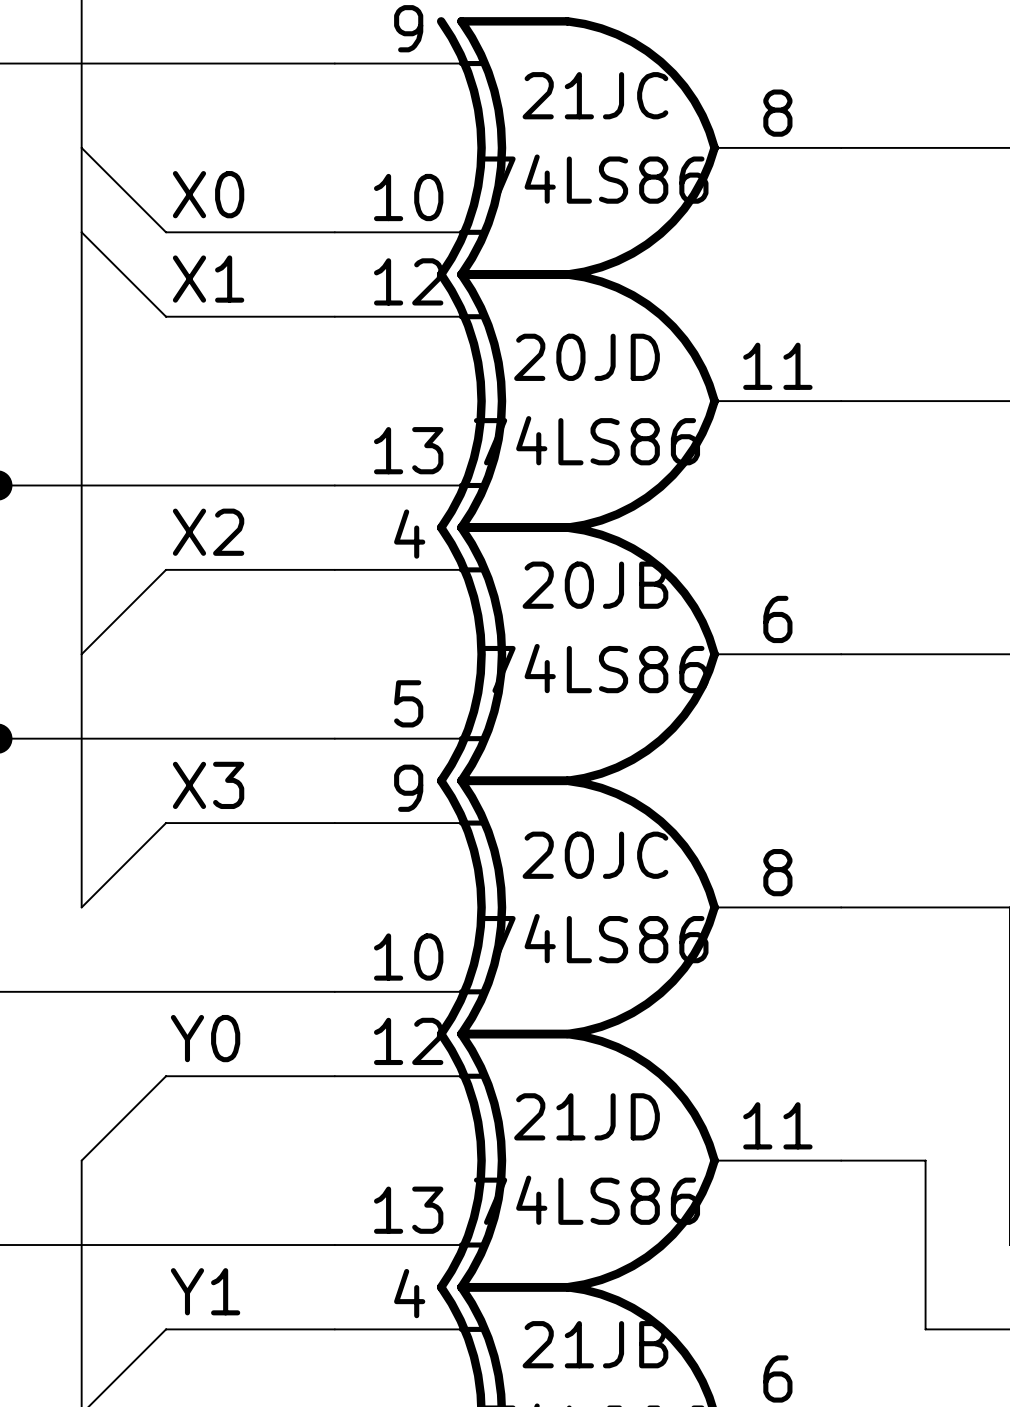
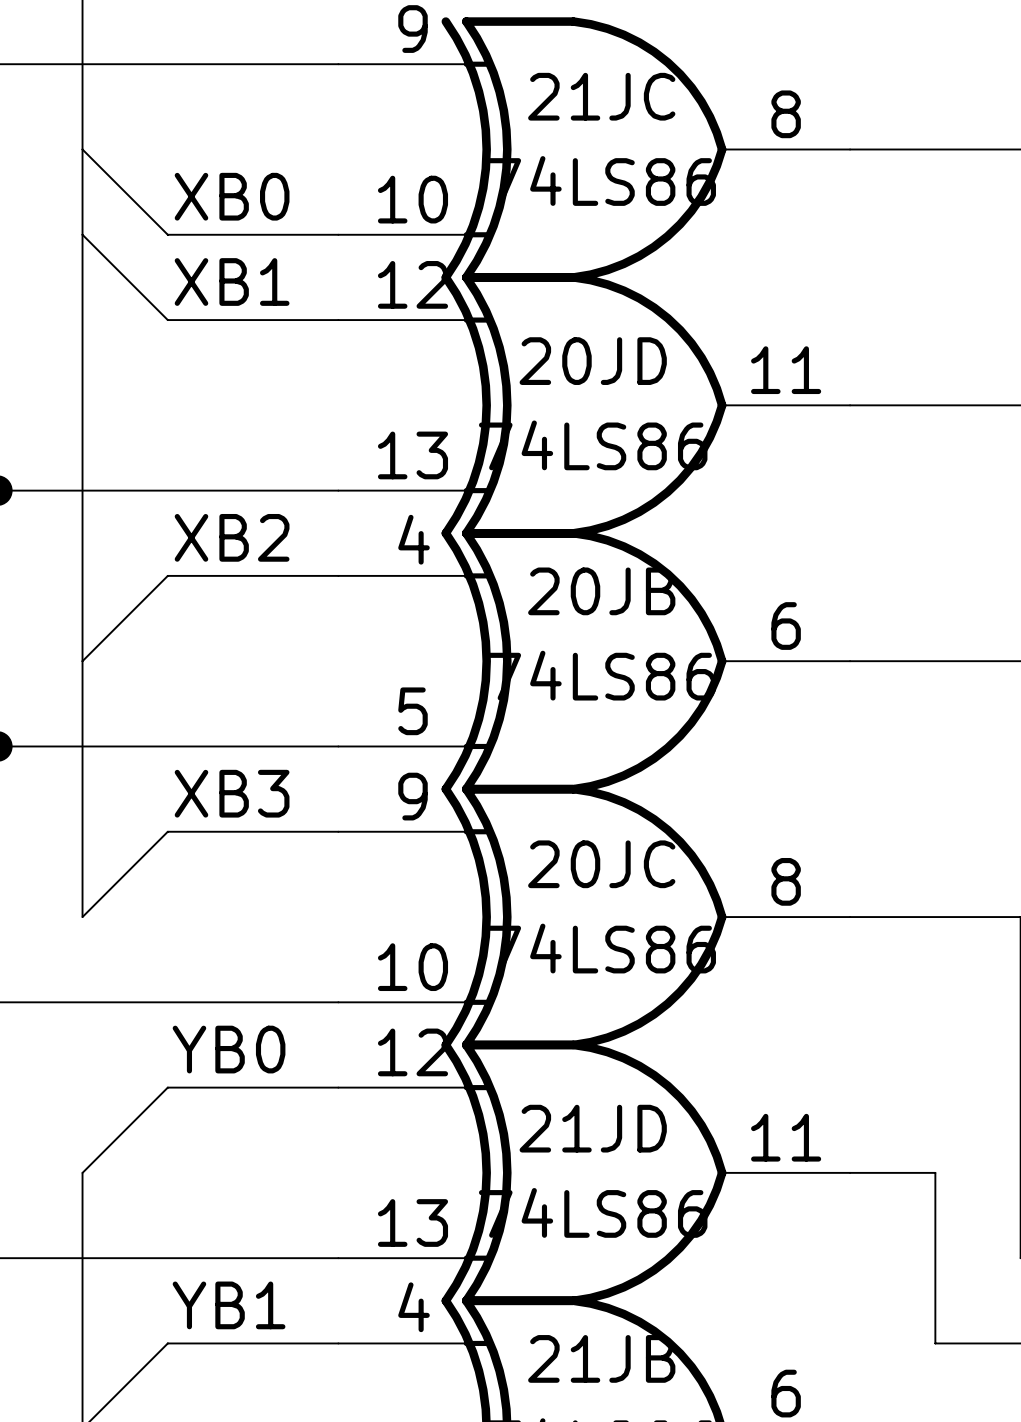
label: X0 (208, 194) -> XB0 (232, 196)
label: X1 (208, 279) -> XB1 (232, 282)
label: X2 (208, 532) -> XB2 (232, 537)
label: X3 (208, 785) -> XB3 (232, 793)
label: Y0 (205, 1038) -> YB0 (229, 1049)
label: Y1 (205, 1291) -> YB1 (229, 1305)

